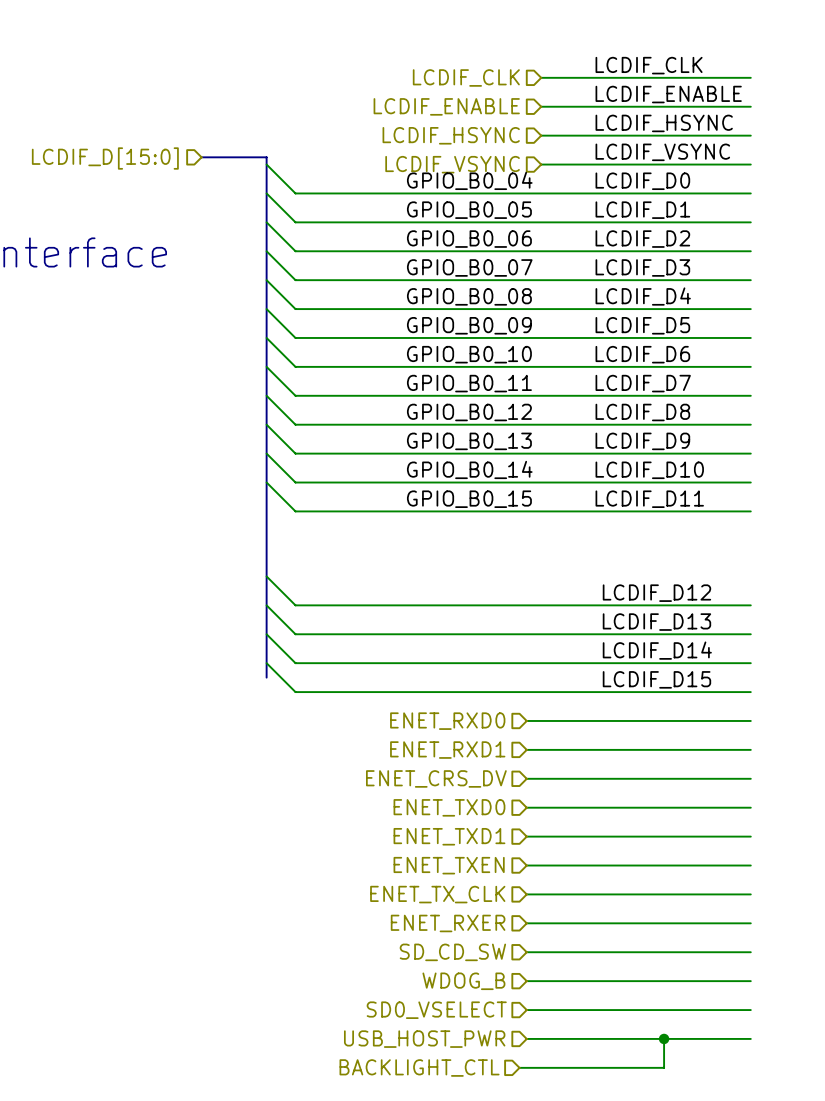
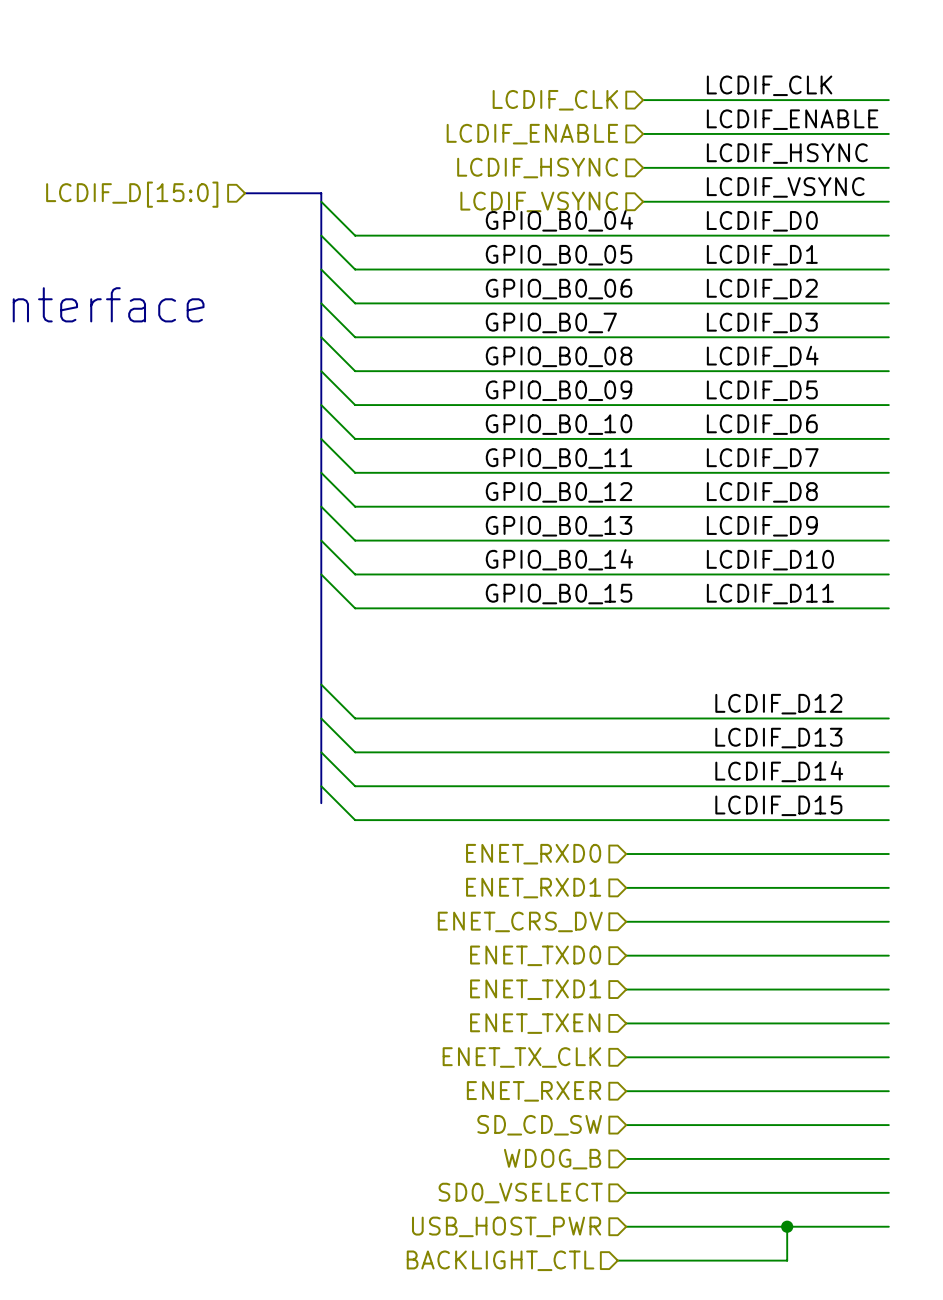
label: GPIO_B0_07 (469, 267) -> GPIO_B0_7 (551, 322)

